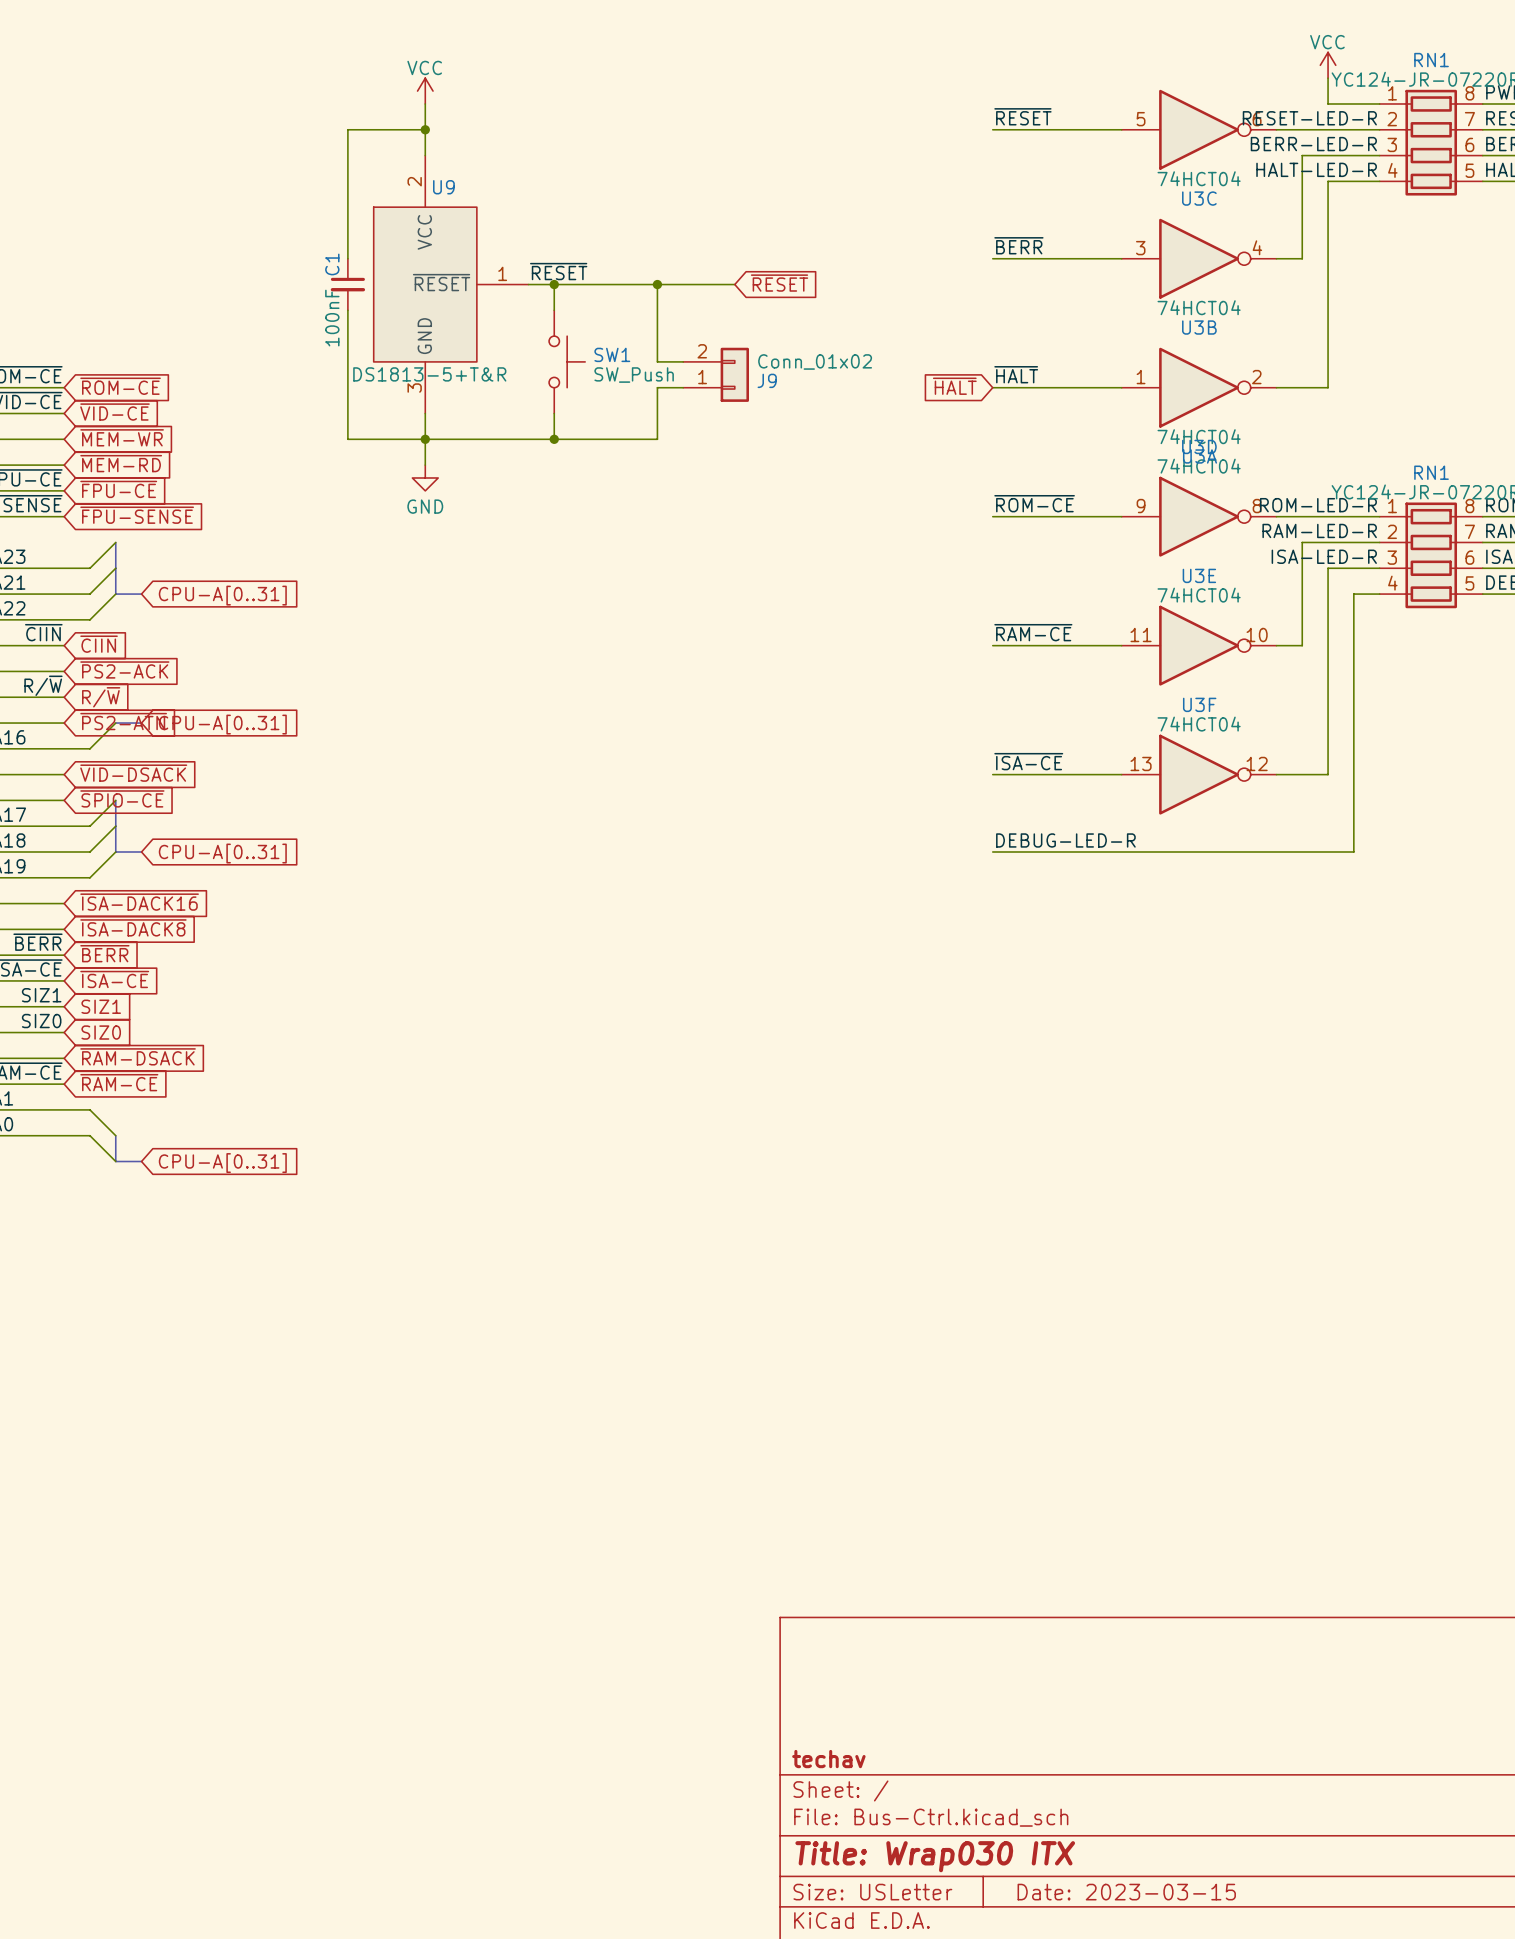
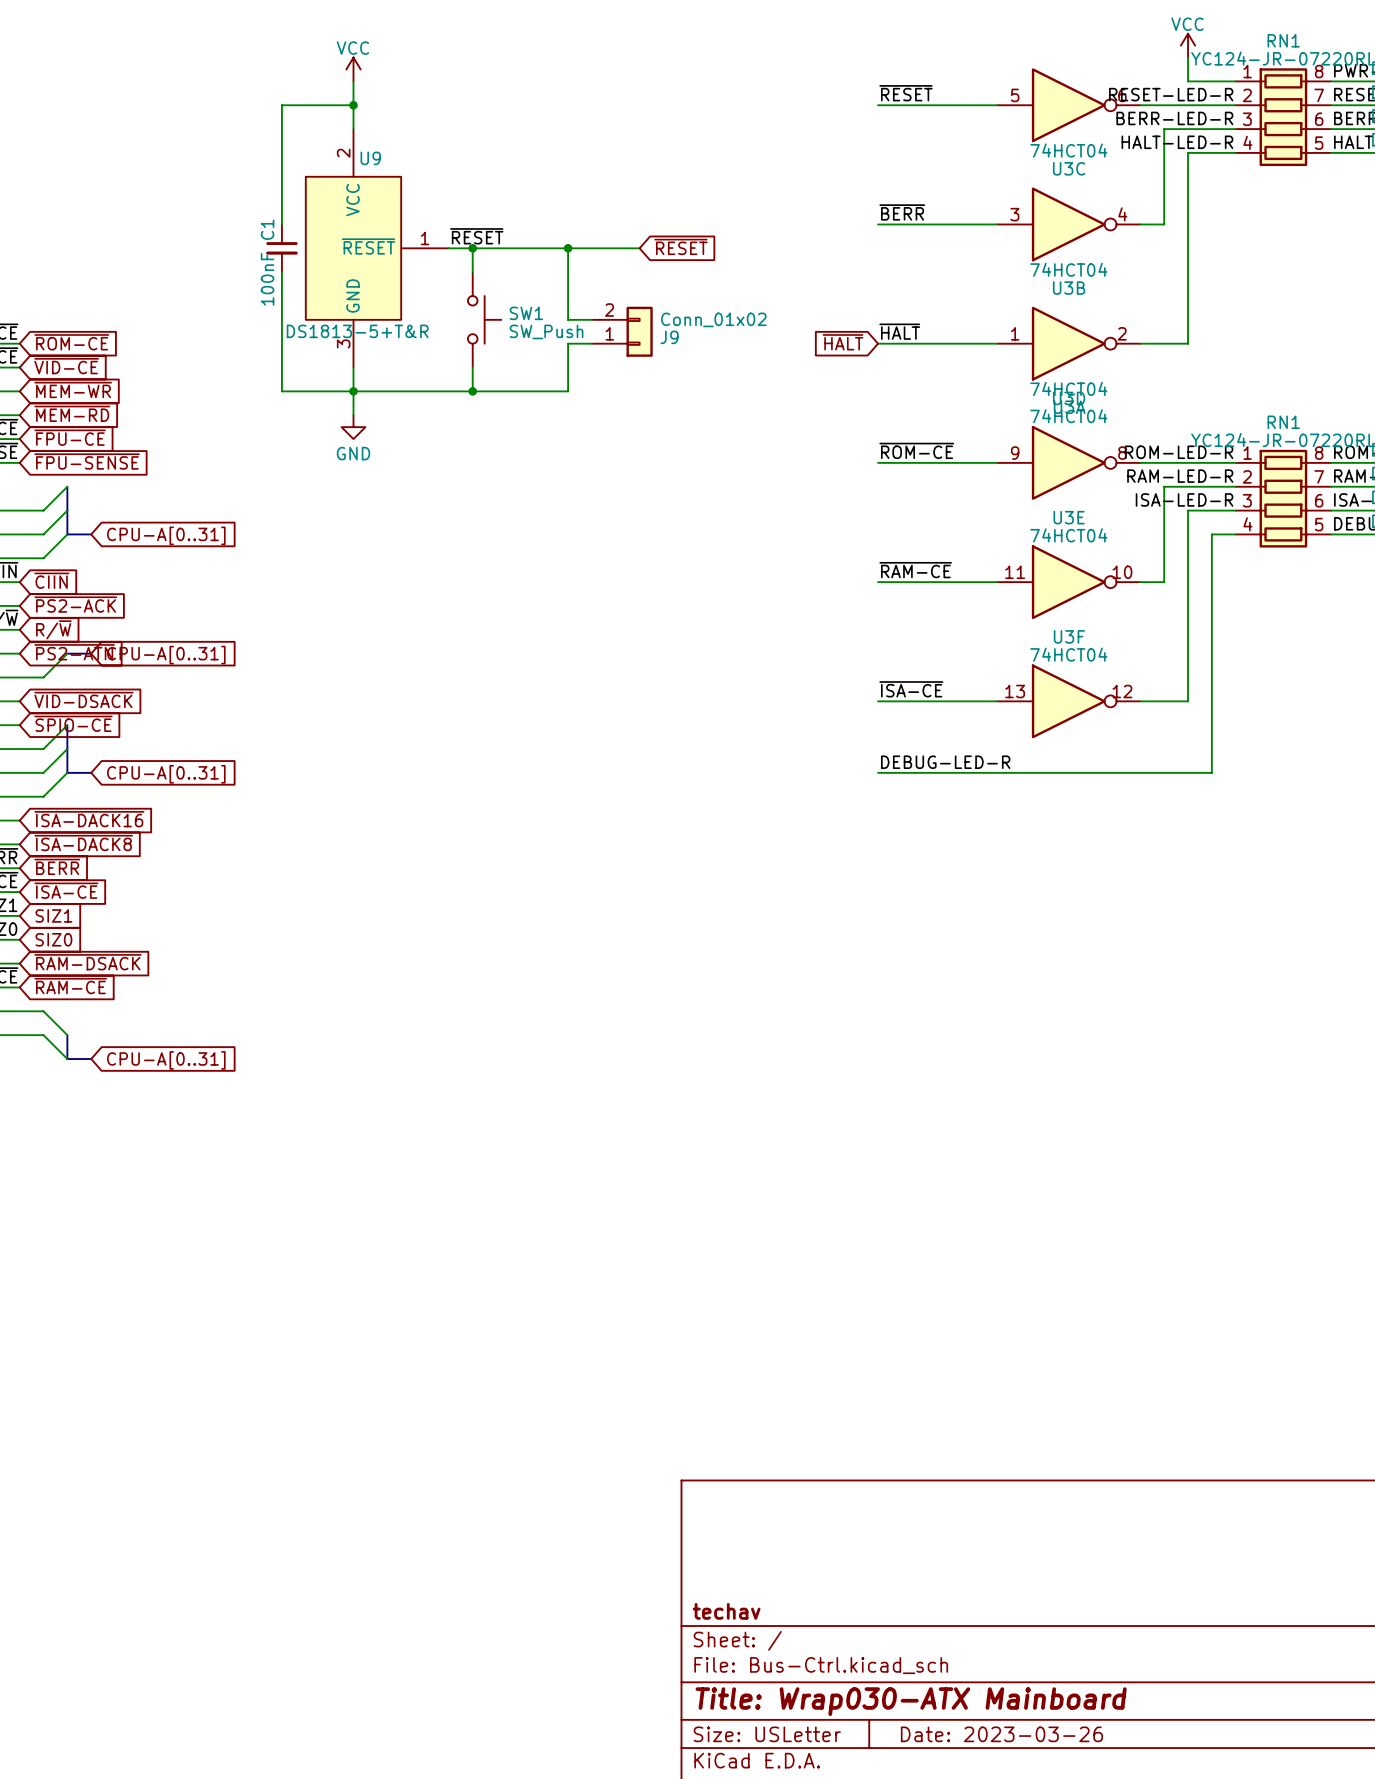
title block: Title: Wrap030 ITX (935, 1856) -> Title: Wrap030-ATX Mainboard (911, 1701)
title block: Date: 2023-03-15 (1126, 1892) -> Date: 2023-03-26 (1001, 1734)

